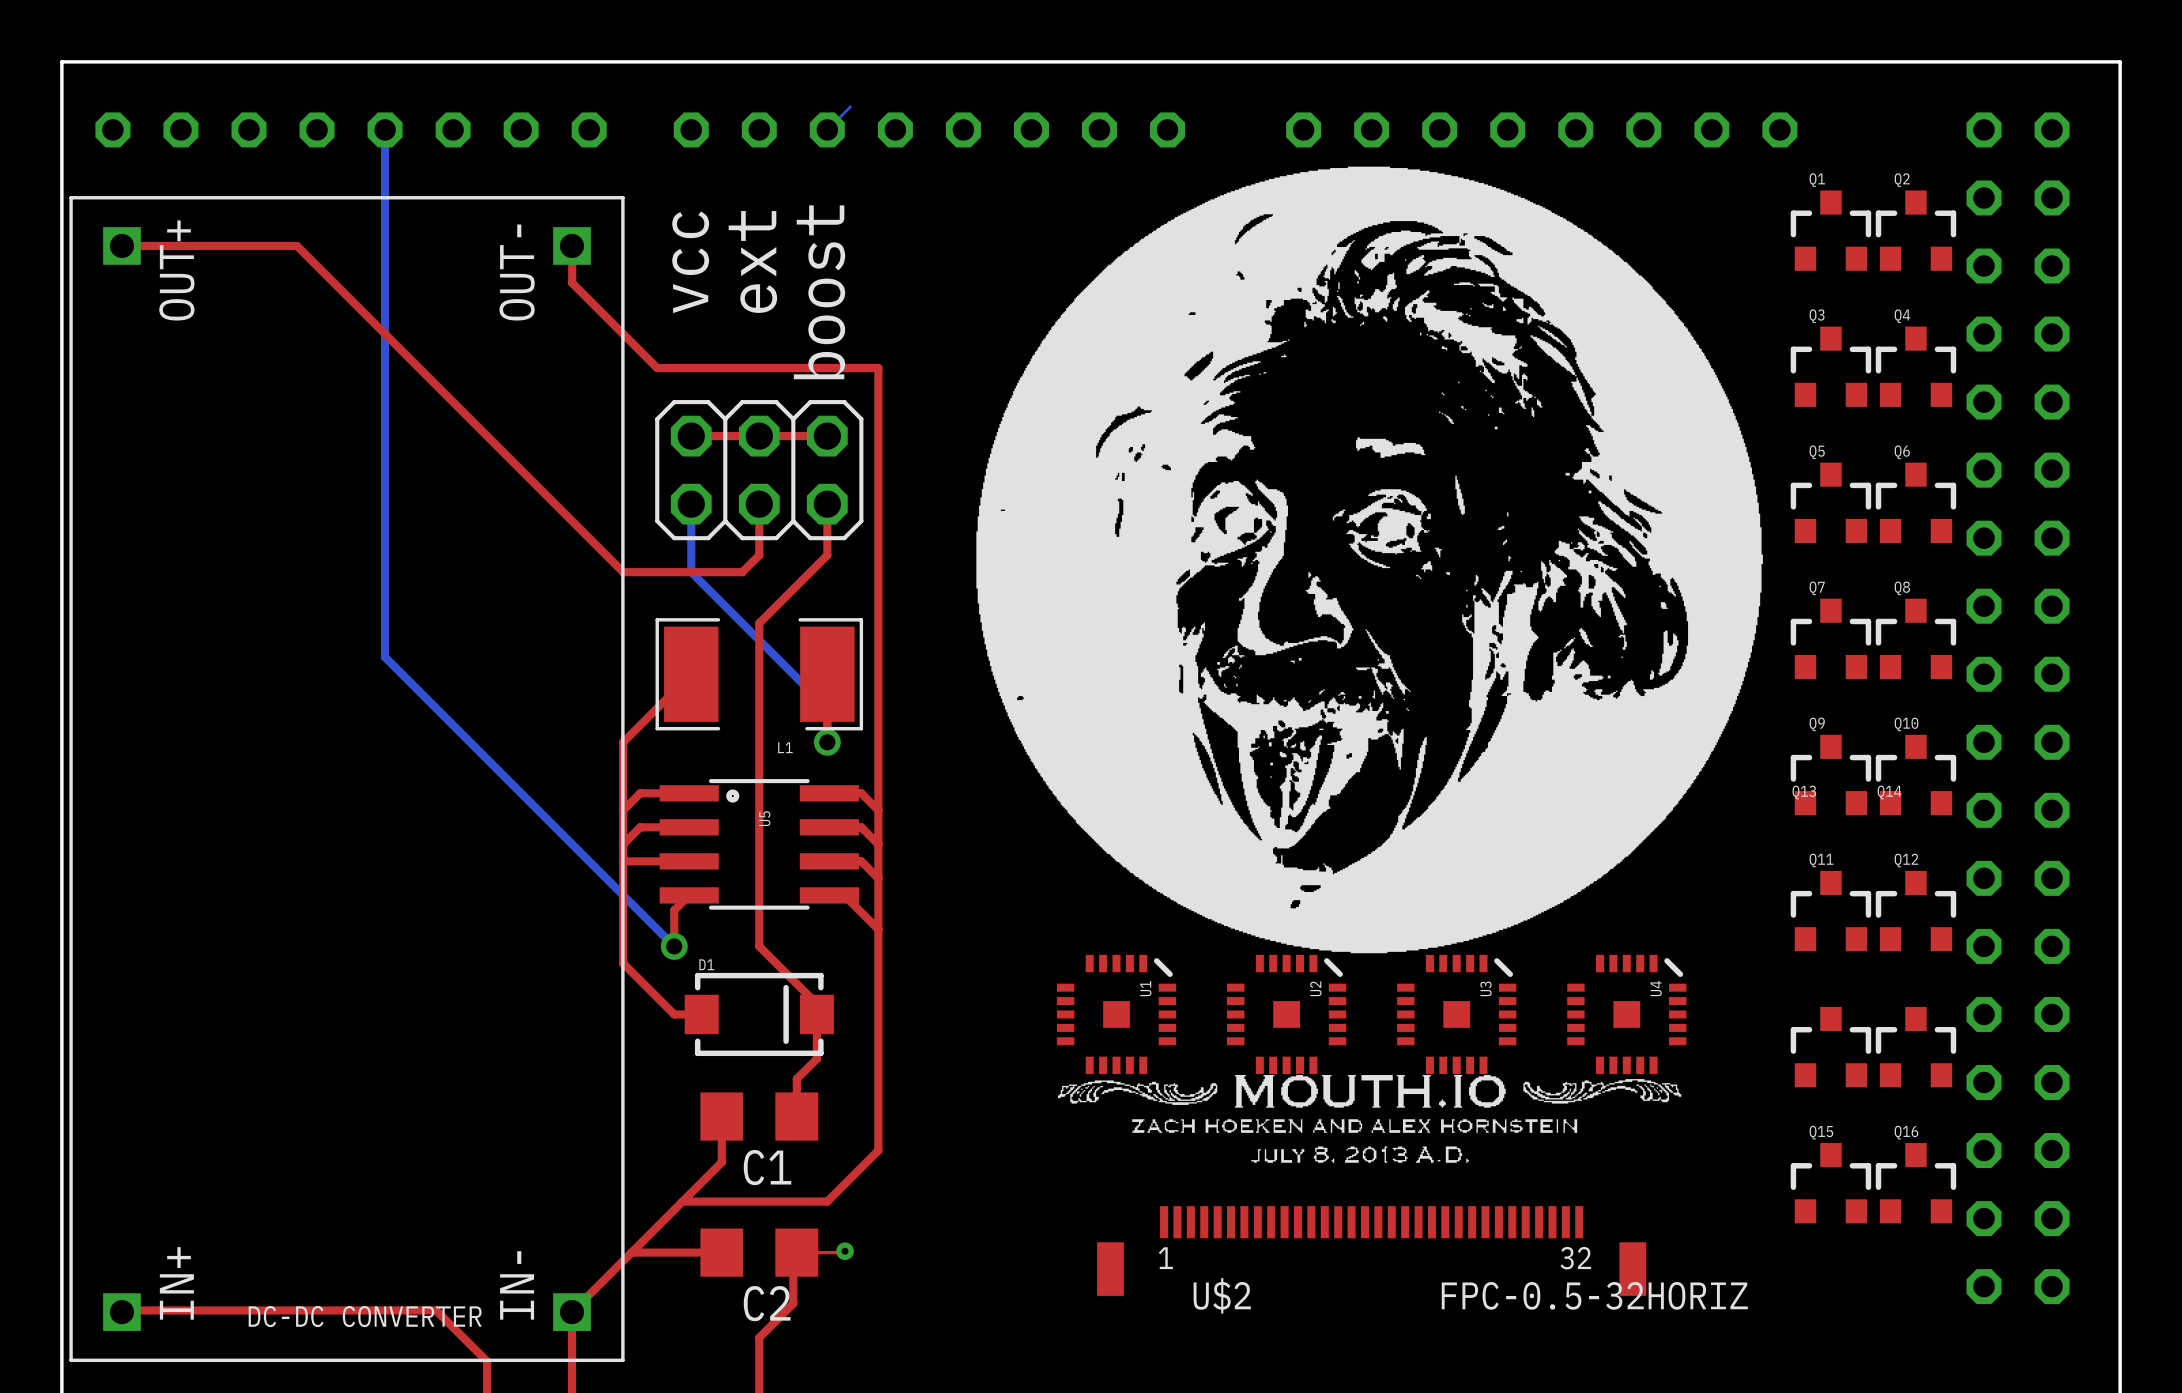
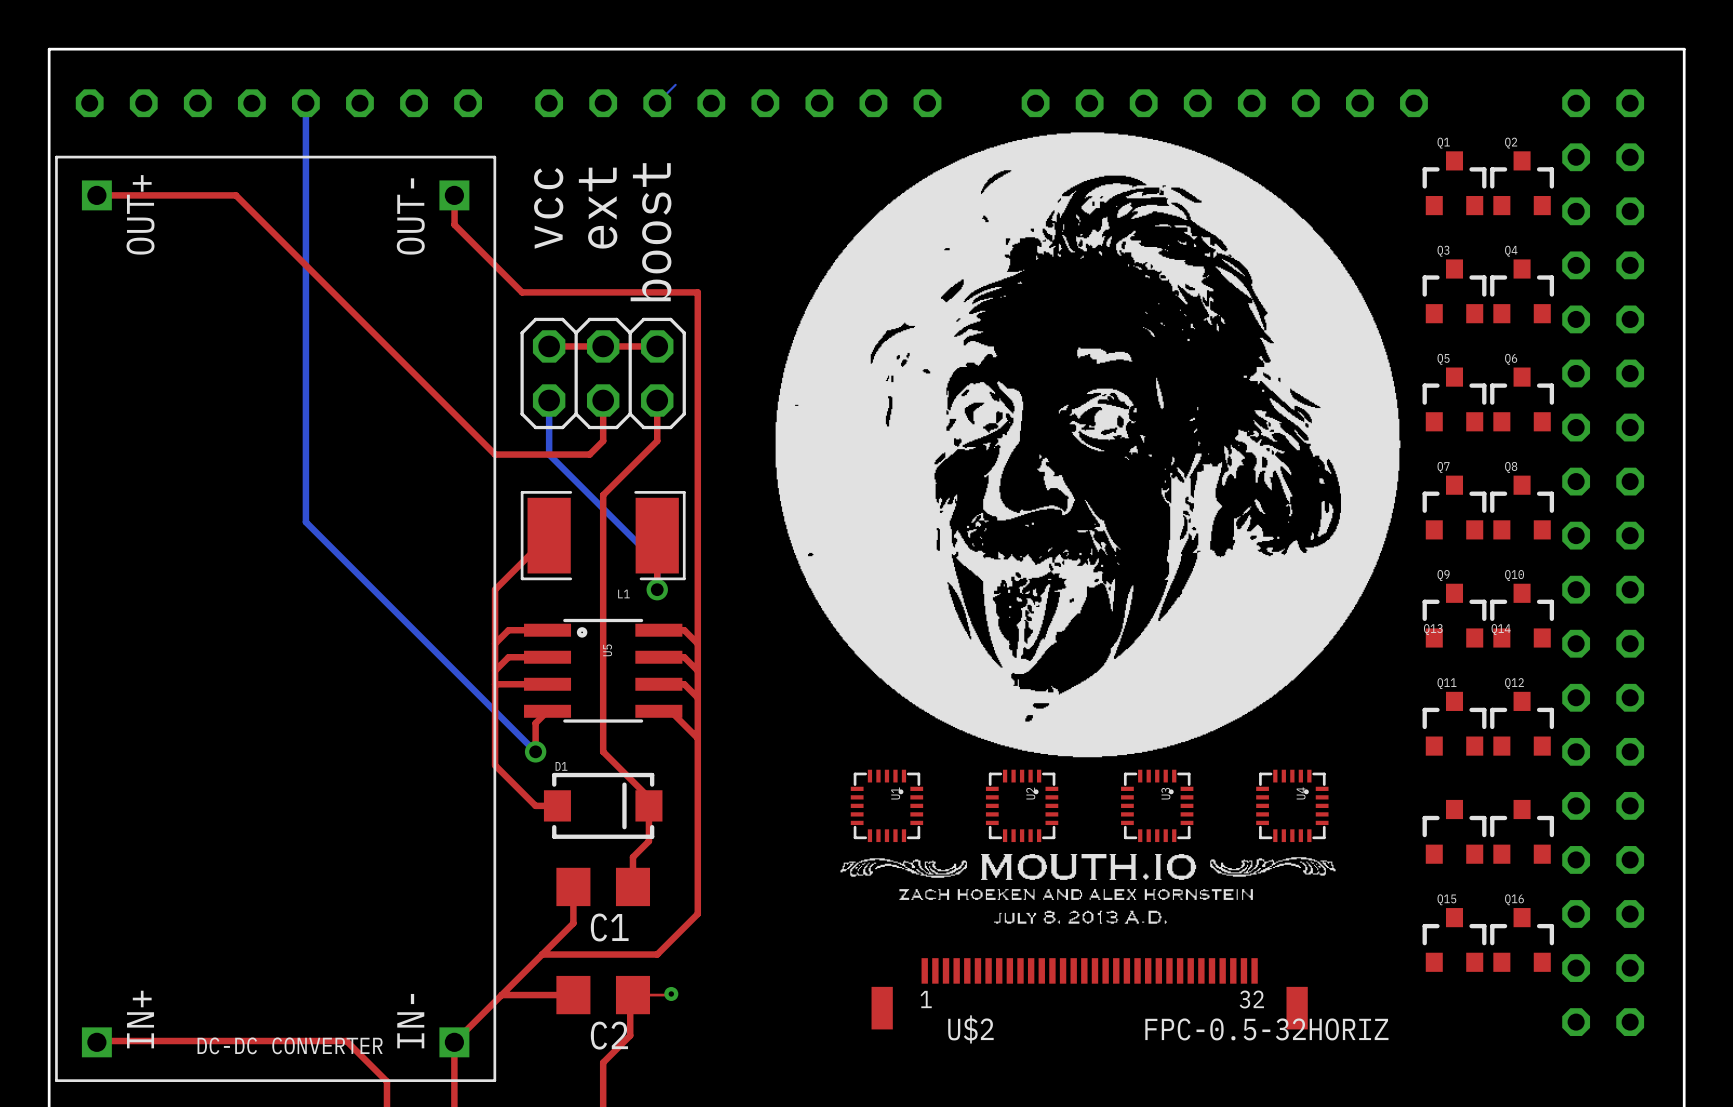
U1 footprint: [1056, 954, 1177, 1075] -> [850, 769, 924, 843]
U2 footprint: [1227, 954, 1347, 1075] -> [985, 769, 1059, 843]
U3 footprint: [1397, 954, 1517, 1075] -> [1121, 769, 1194, 843]
U4 footprint: [1567, 954, 1687, 1075] -> [1256, 769, 1329, 843]

